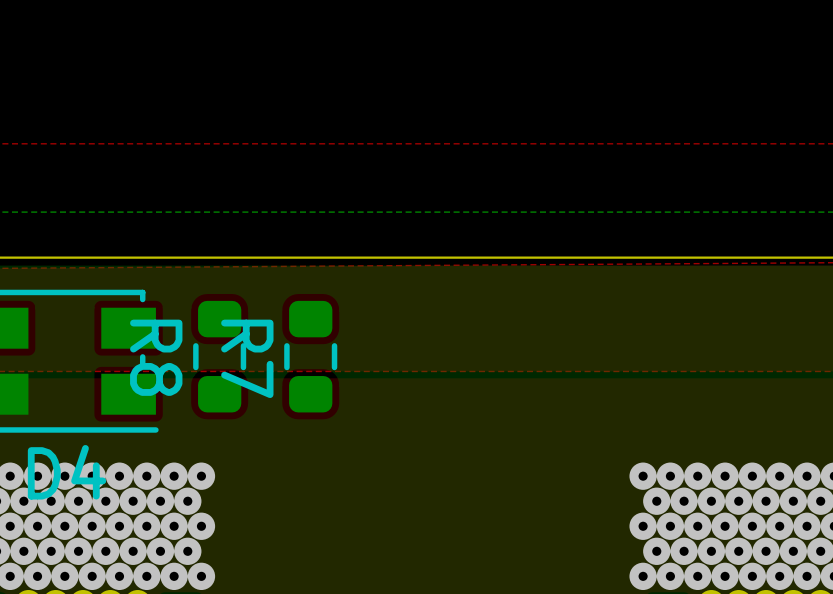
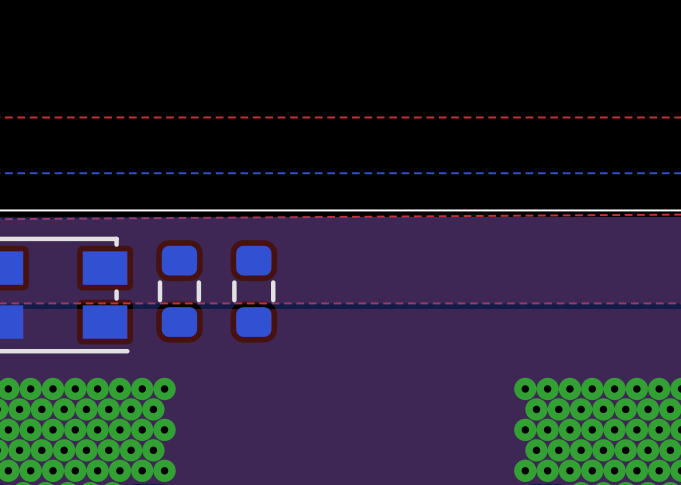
R8 name: R8 (156, 357) -> none
R7 name: R7 (247, 358) -> none
D4 name: D4 (67, 472) -> none

